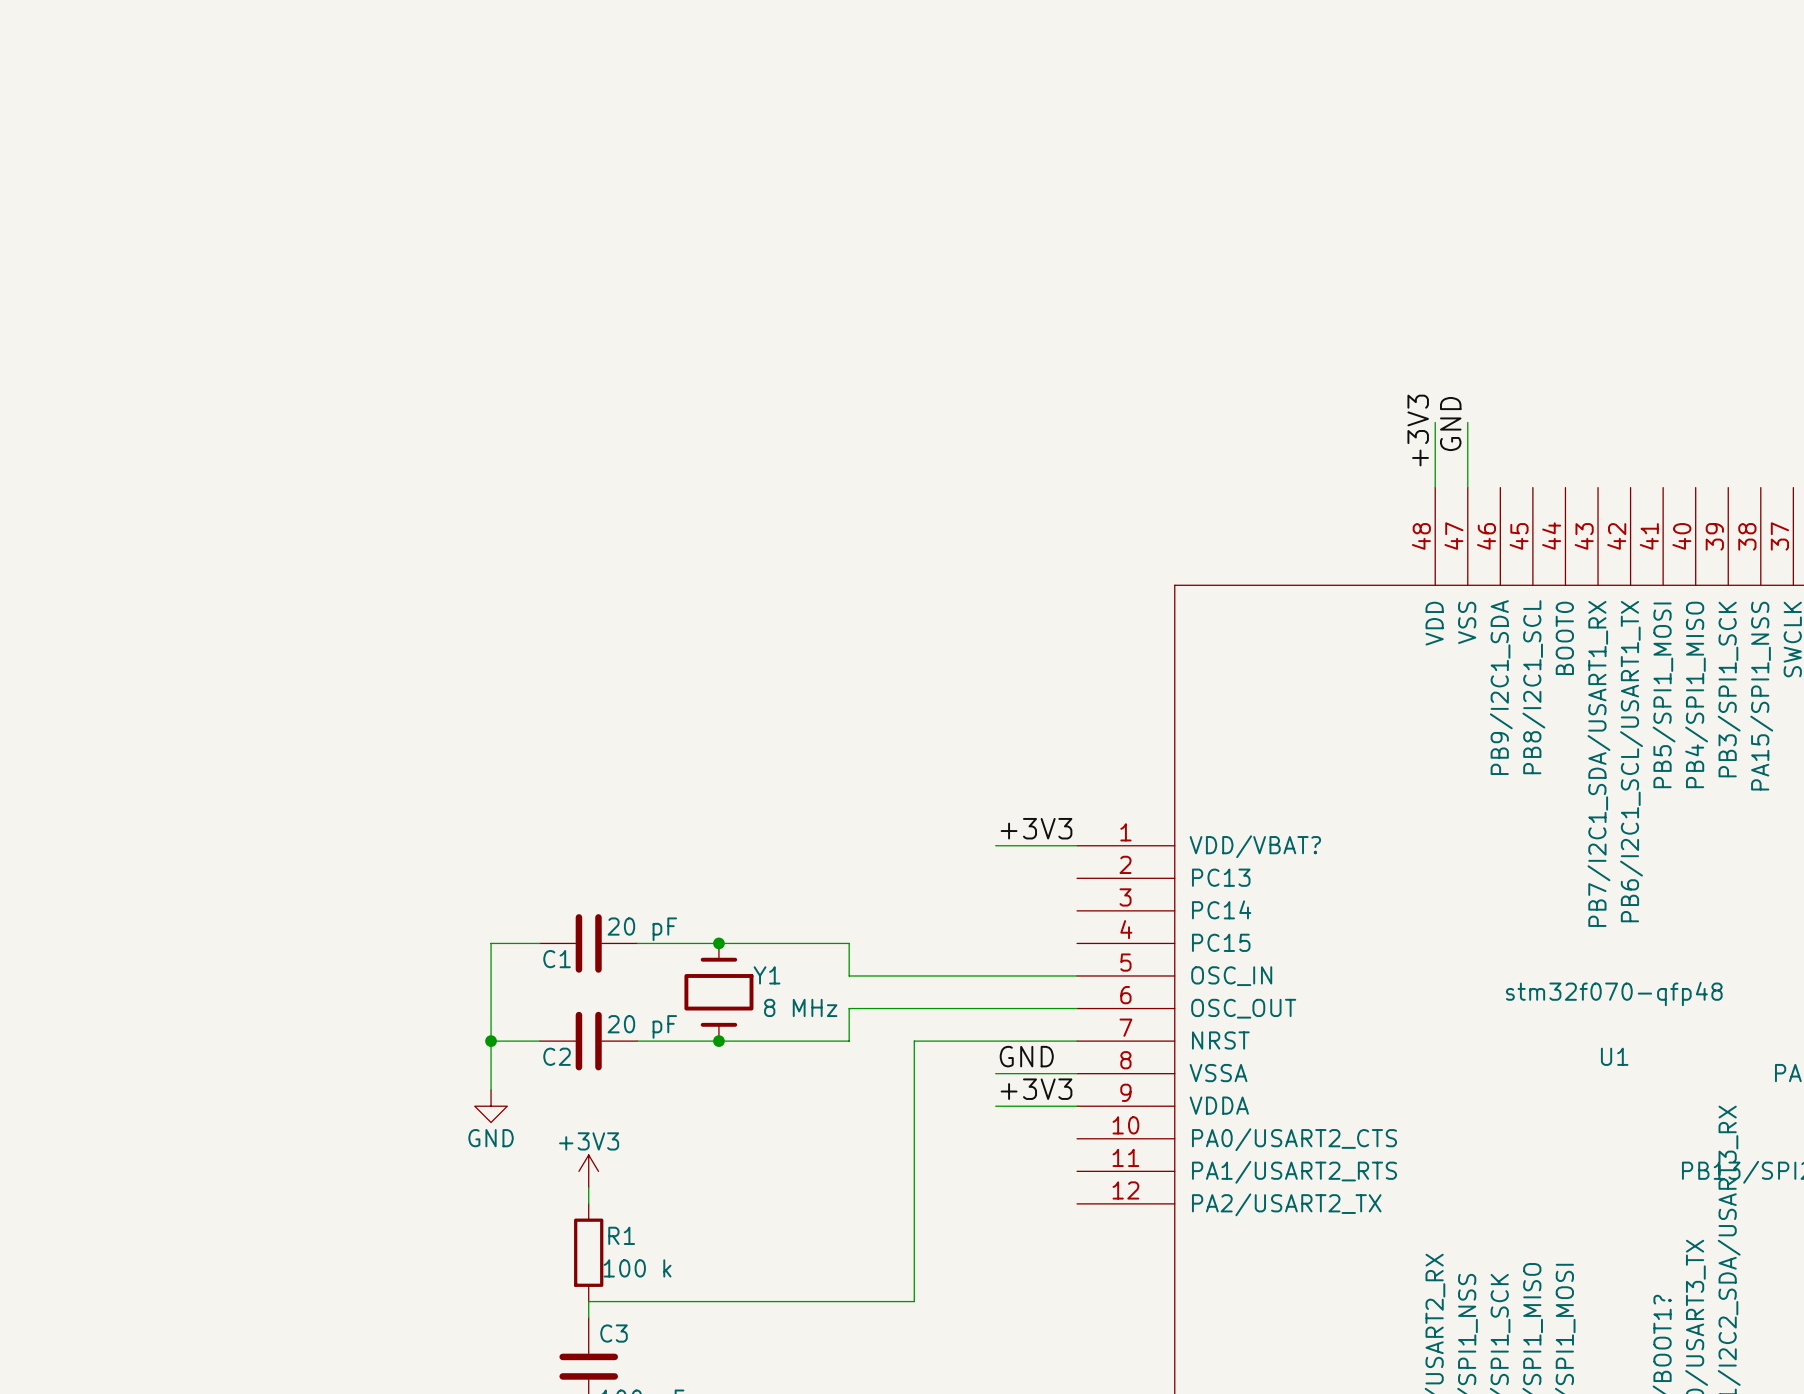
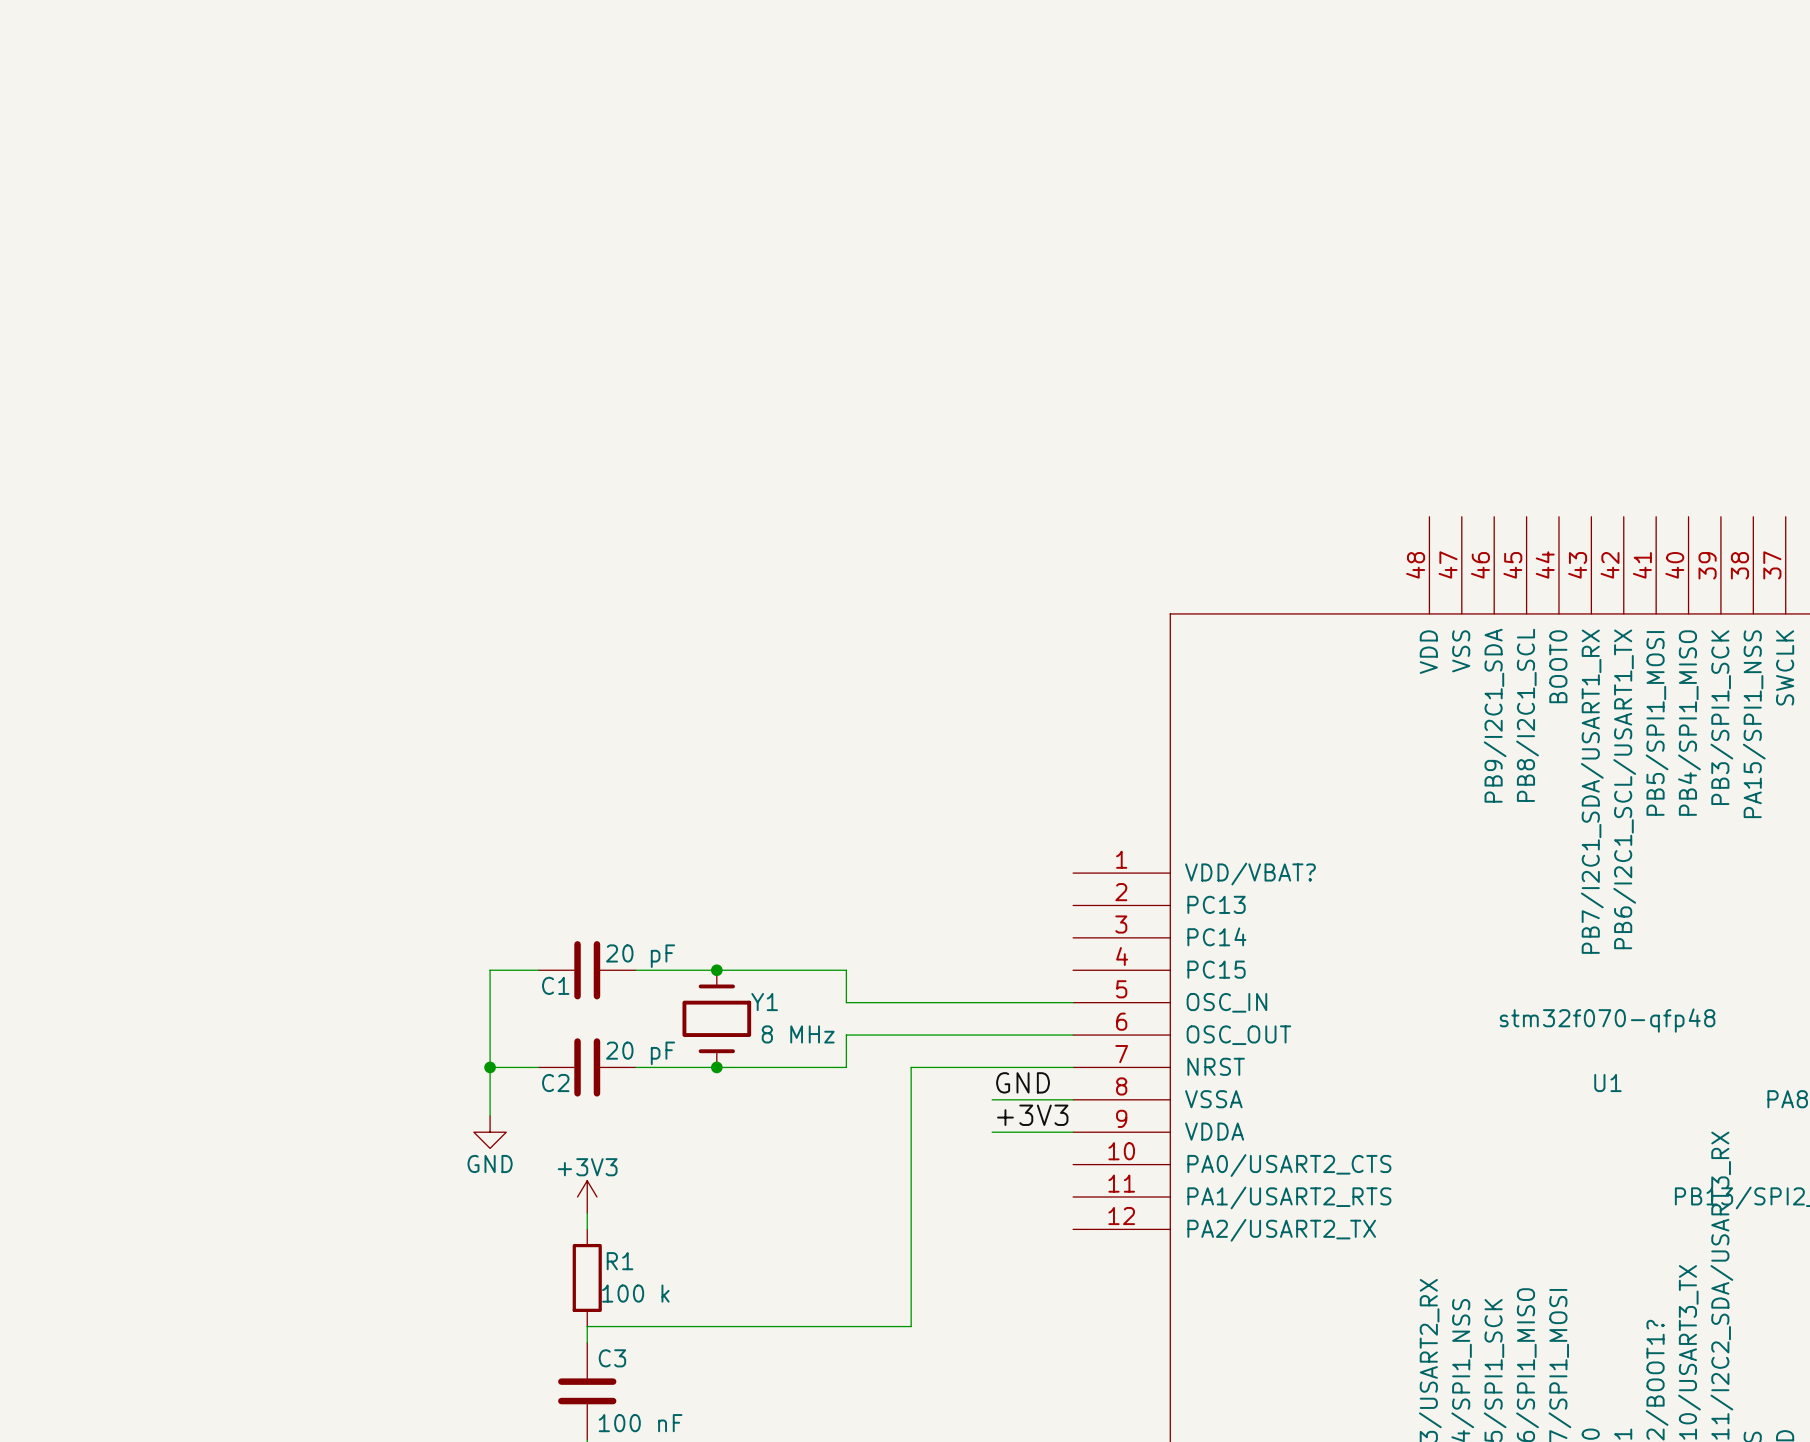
wire: (1435, 422) (1435, 487) -> none
wire: (1467, 422) (1467, 487) -> none
label: GND (1450, 424) -> none
label: +3V3 (1418, 430) -> none
label: +3V3 (1036, 828) -> none
wire: (995, 845) (1077, 845) -> none

